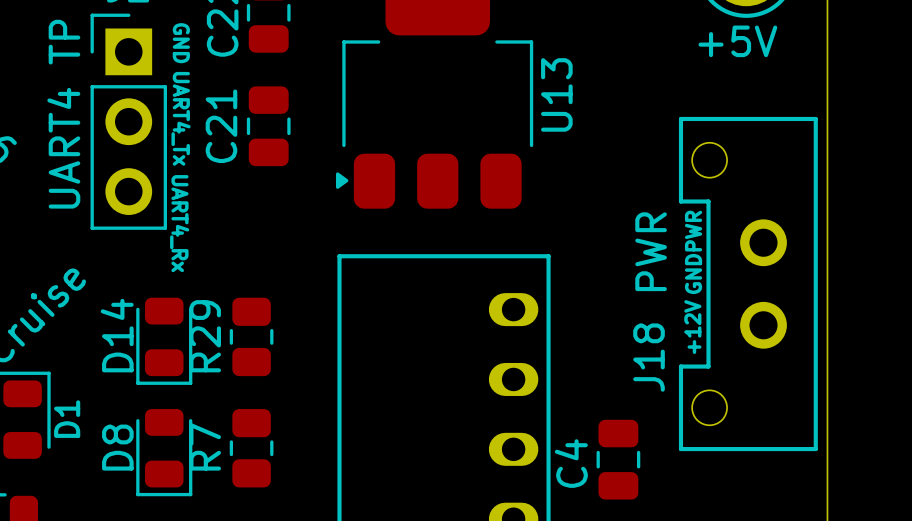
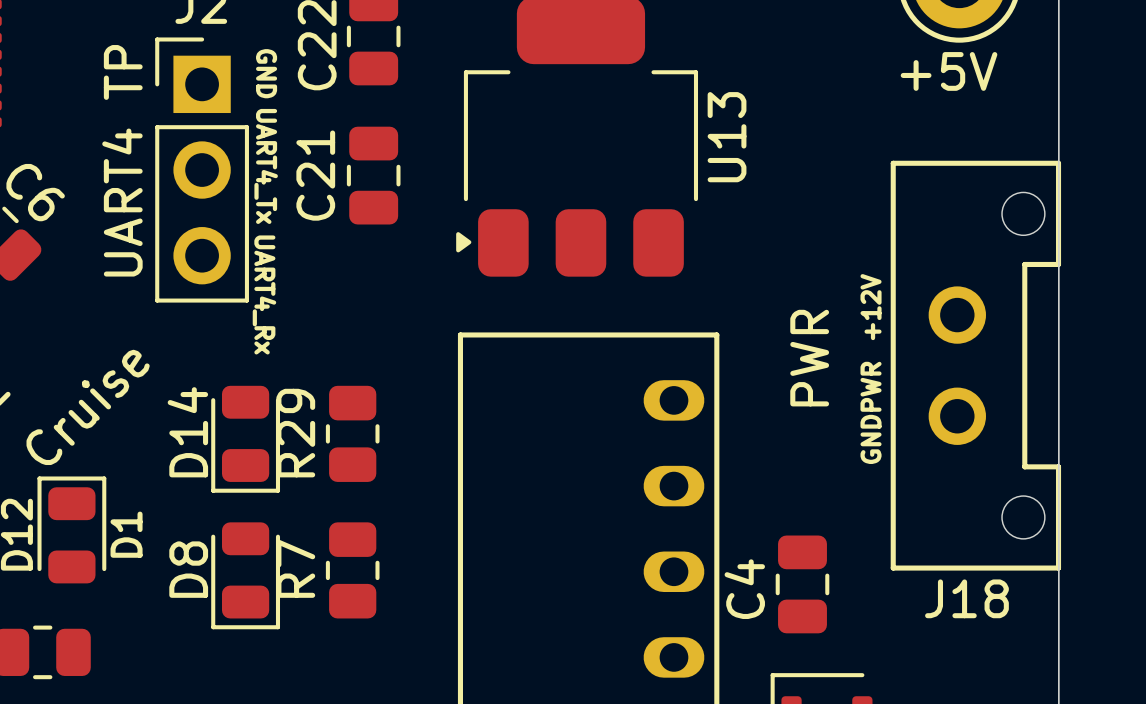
text: none -> +12V (871, 307)
text position: PWR (651, 251) -> PWR (809, 358)
text: GNDPWR (693, 252) -> none
J18 rotation: 0° (748, 284) -> 180° (975, 365)
text: +12V (692, 327) -> GNDPWR (871, 412)
J18 name position: J18 (649, 357) -> J18 (966, 598)

